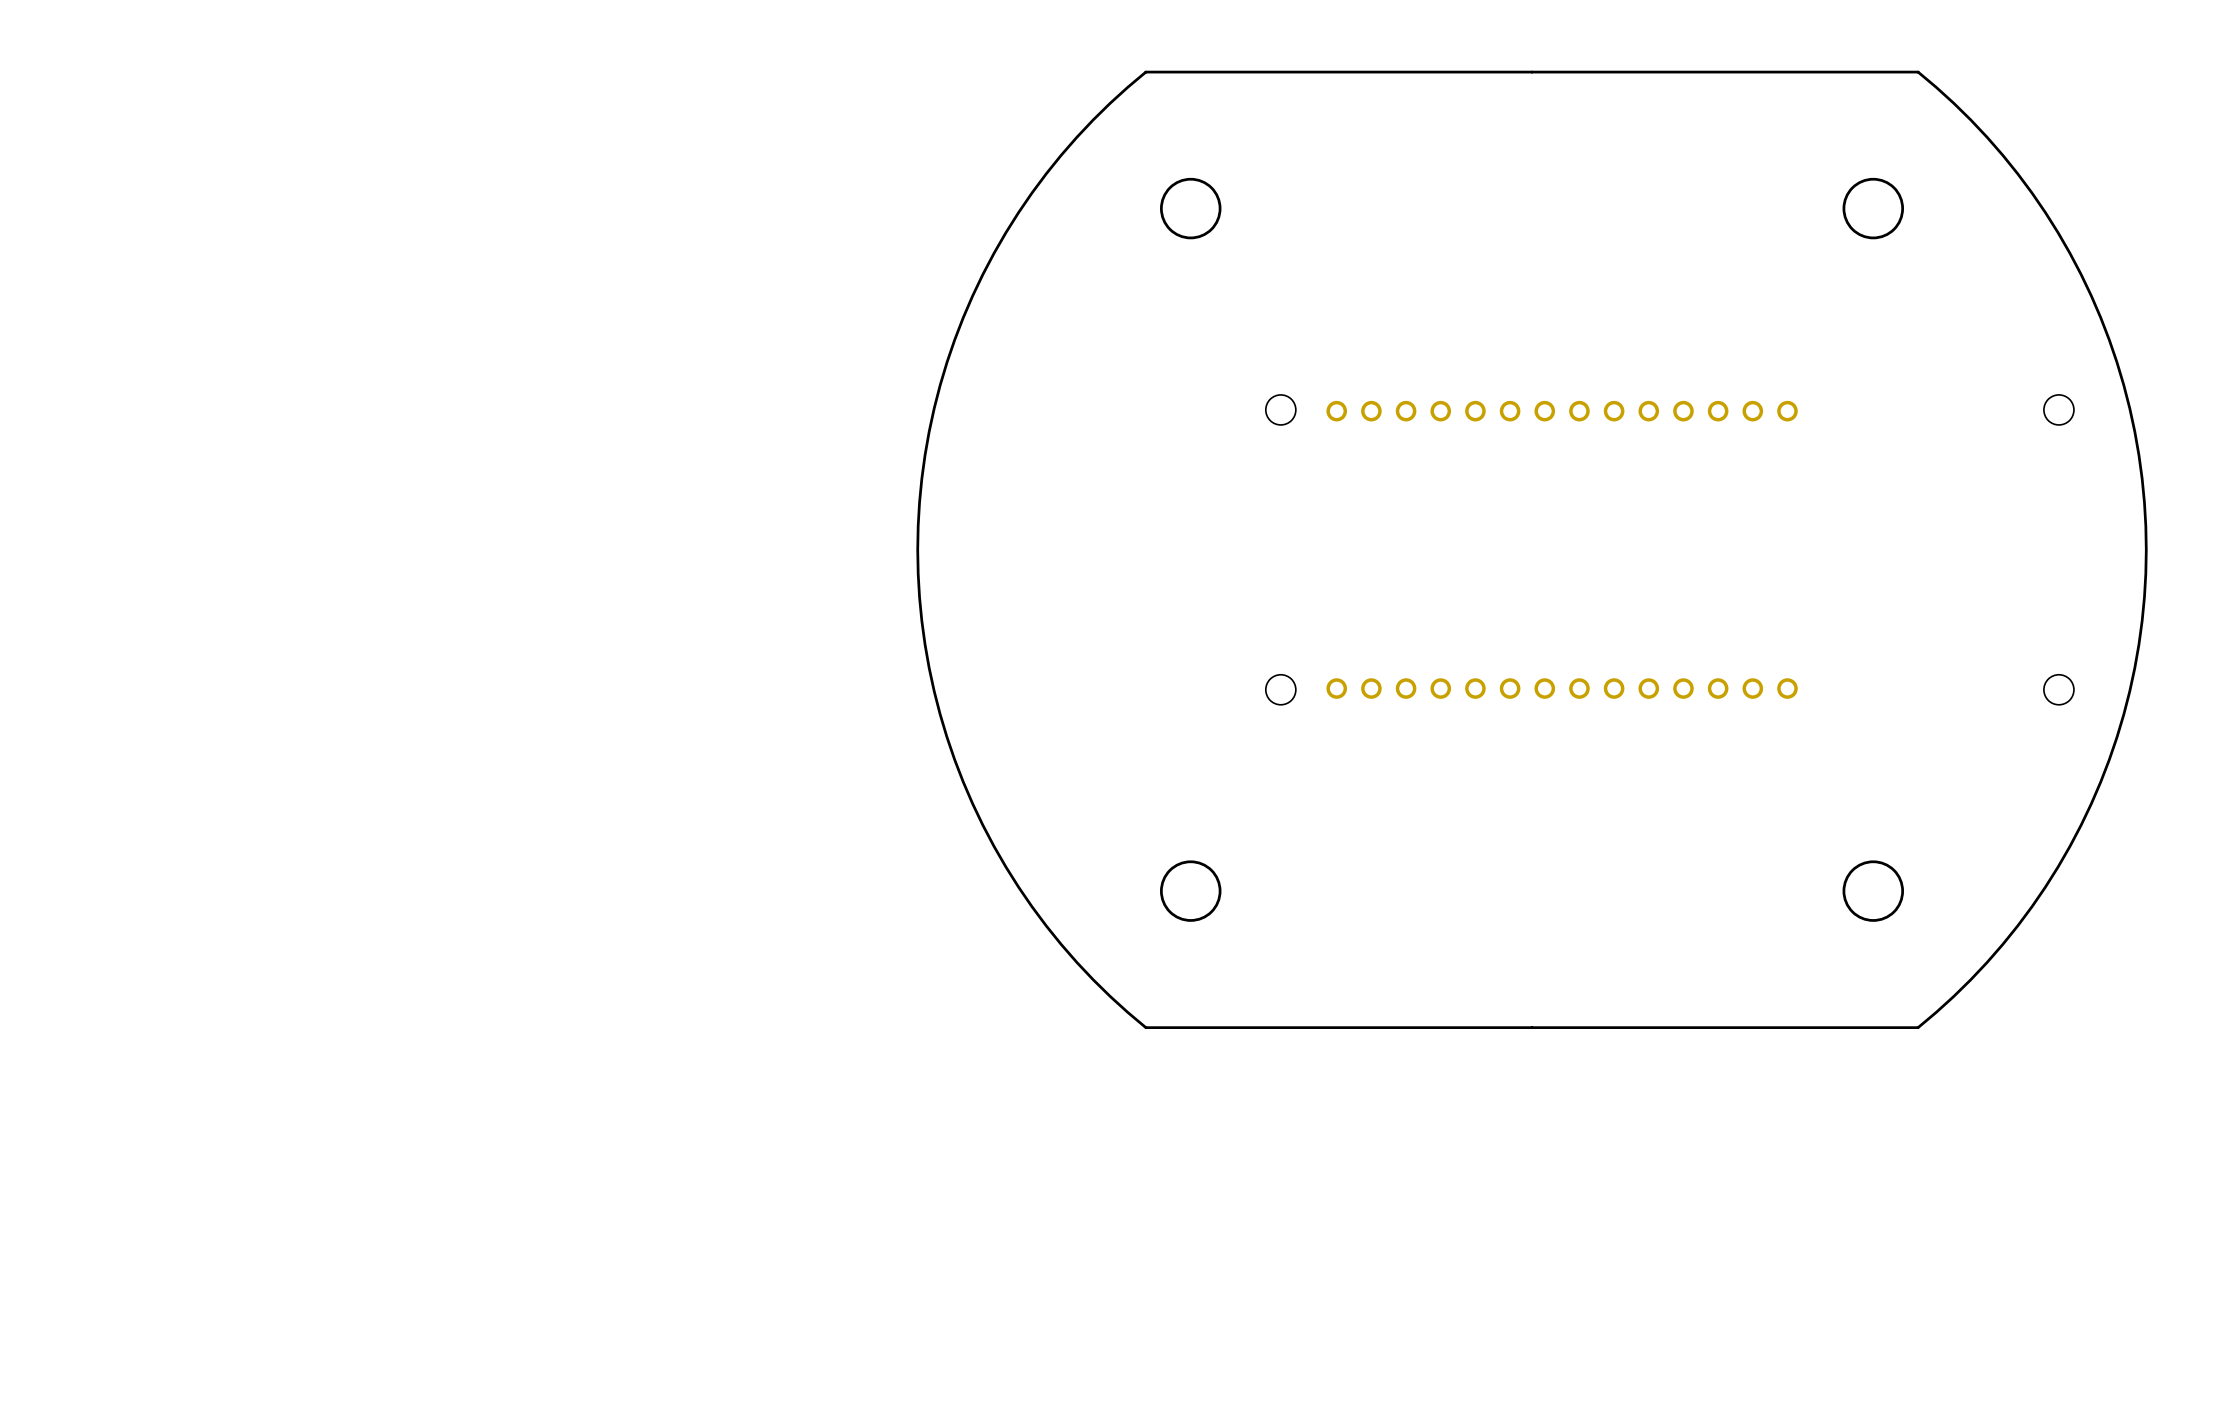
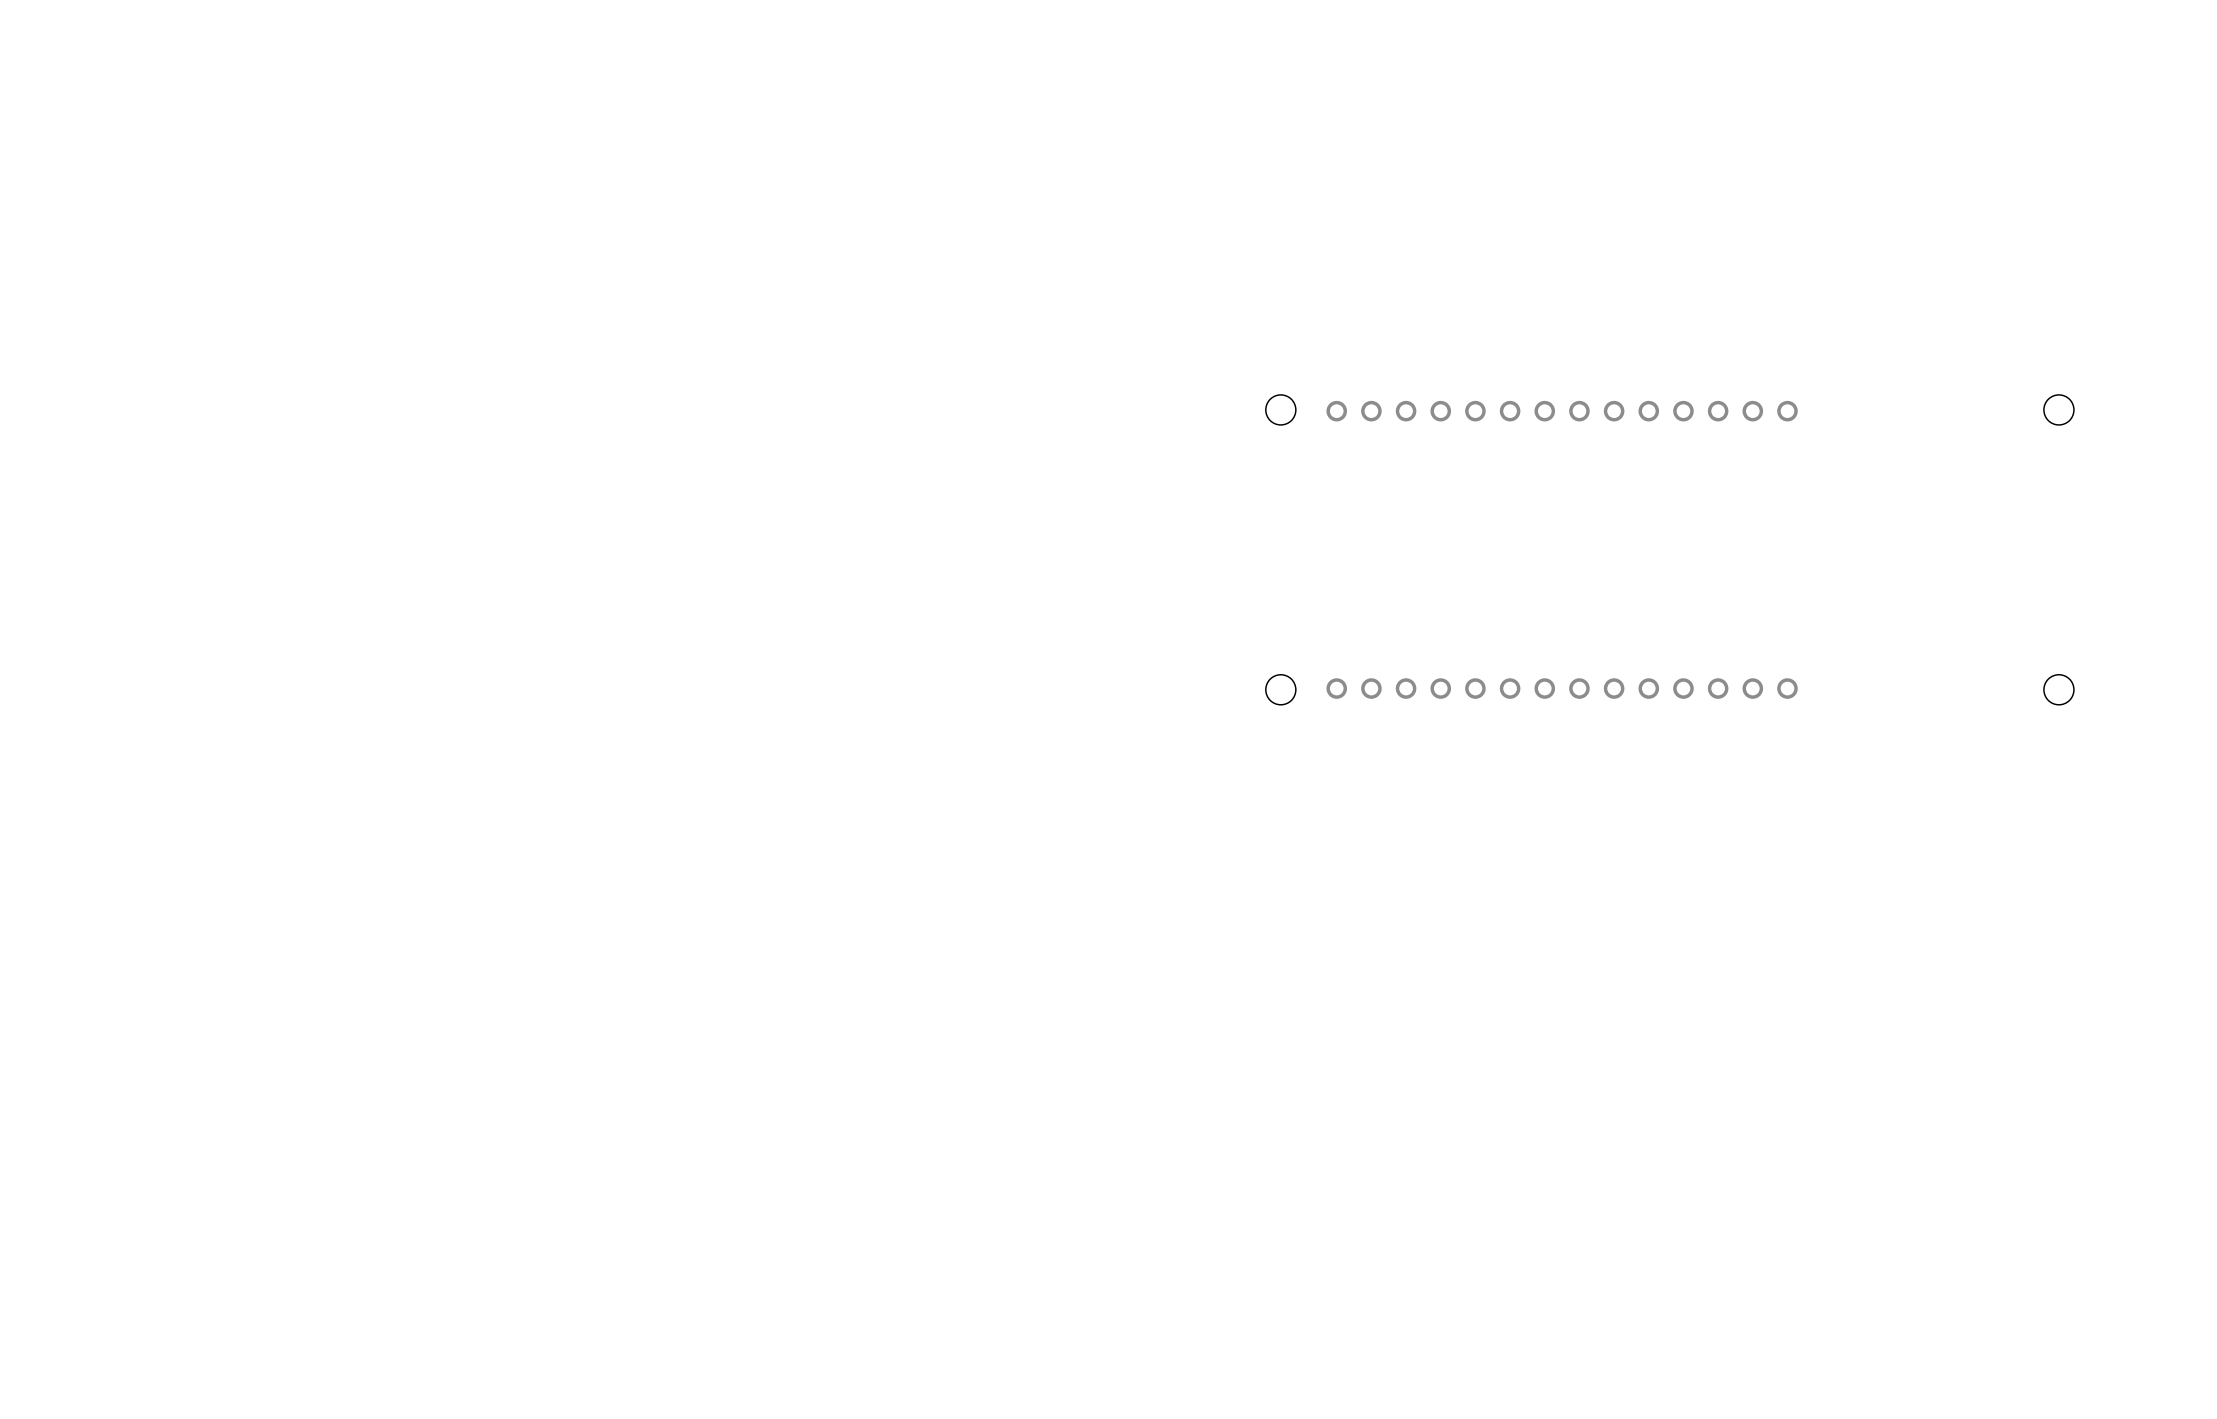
board edge: (1918, 72) (1145, 72) (1093, 120) (1061, 155) (1018, 212) (994, 253) (972, 295) (946, 362) (929, 431) (921, 478) (917, 549) (919, 597) (929, 668) (946, 737) (972, 803) (994, 846) (1018, 887) (1061, 944) (1093, 979) (1145, 1027) (1918, 1027) (1970, 979) (2002, 944) (2045, 887) (2070, 846) (2091, 803) (2117, 737) (2129, 691) (2142, 621) (2146, 549) (2144, 502) (2134, 431) (2117, 362) (2091, 295) (2070, 253) (2045, 212) (2002, 155) (1970, 120) (1918, 72) -> none
round board edge: [1160, 177, 1222, 240] -> none
round board edge: [1842, 177, 1904, 240] -> none
round board edge: [1160, 860, 1222, 922] -> none
round board edge: [1842, 860, 1904, 922] -> none

